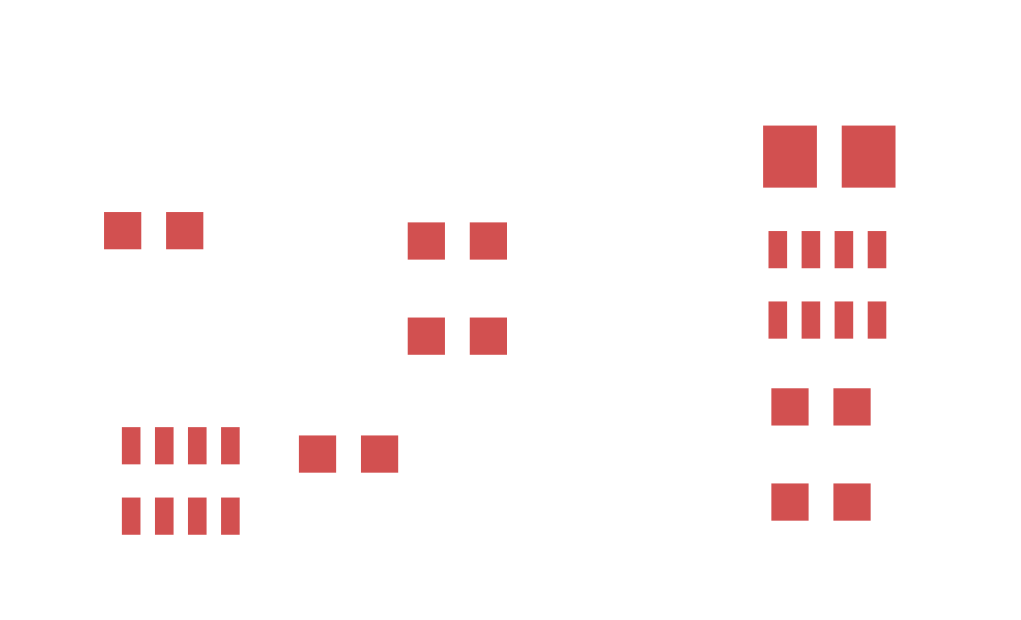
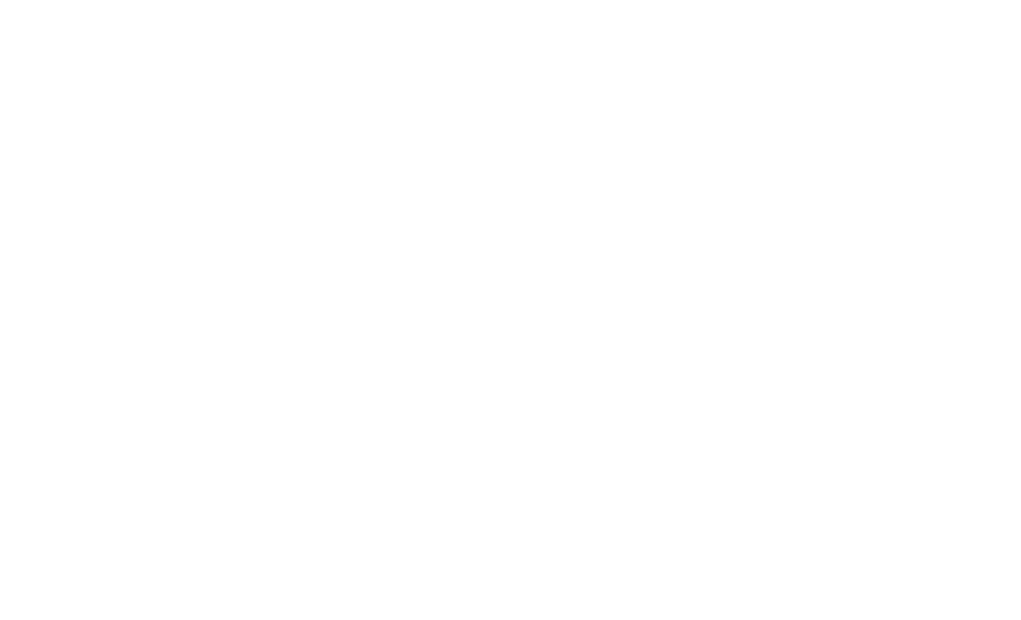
part: (829, 156) -> none
part: (153, 230) -> none
part: (457, 241) -> none
part: (827, 284) -> none
part: (457, 336) -> none
part: (821, 406) -> none
part: (348, 454) -> none
part: (180, 480) -> none
part: (821, 502) -> none

